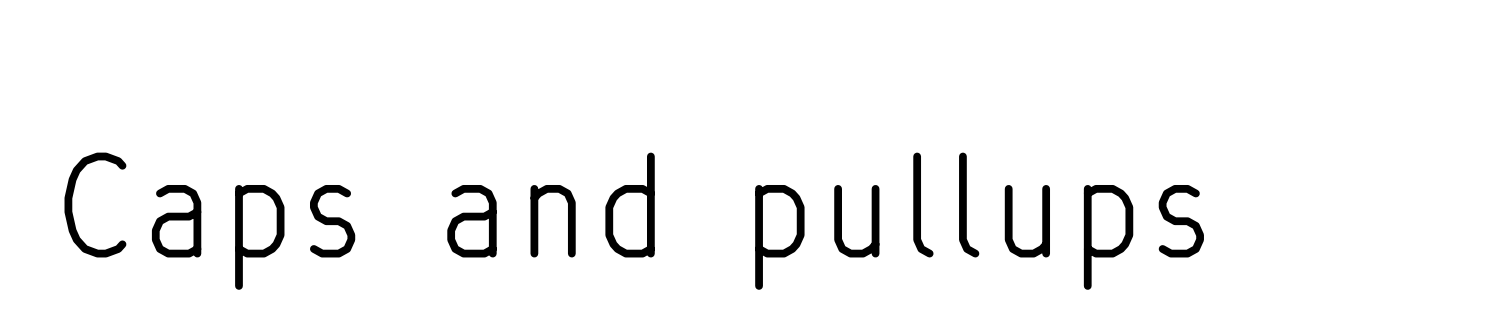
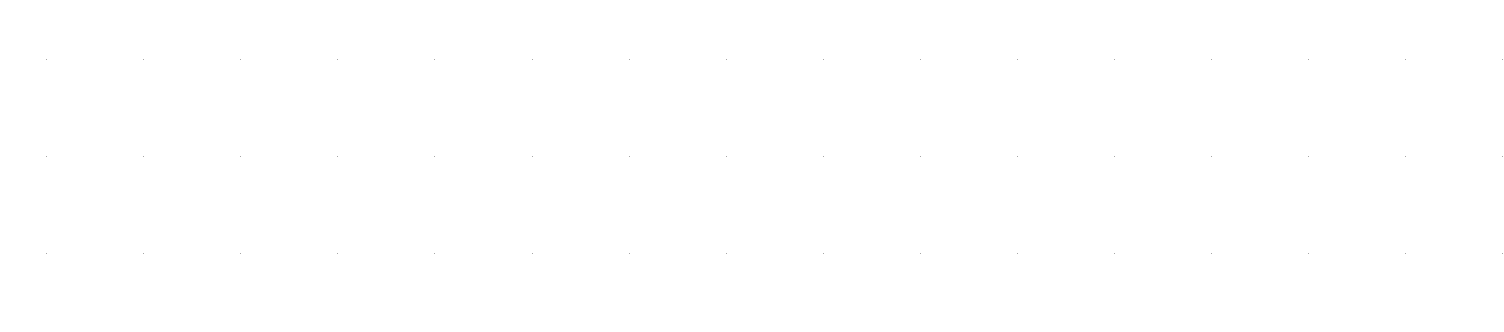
text: Caps and pullups (634, 221) -> none

